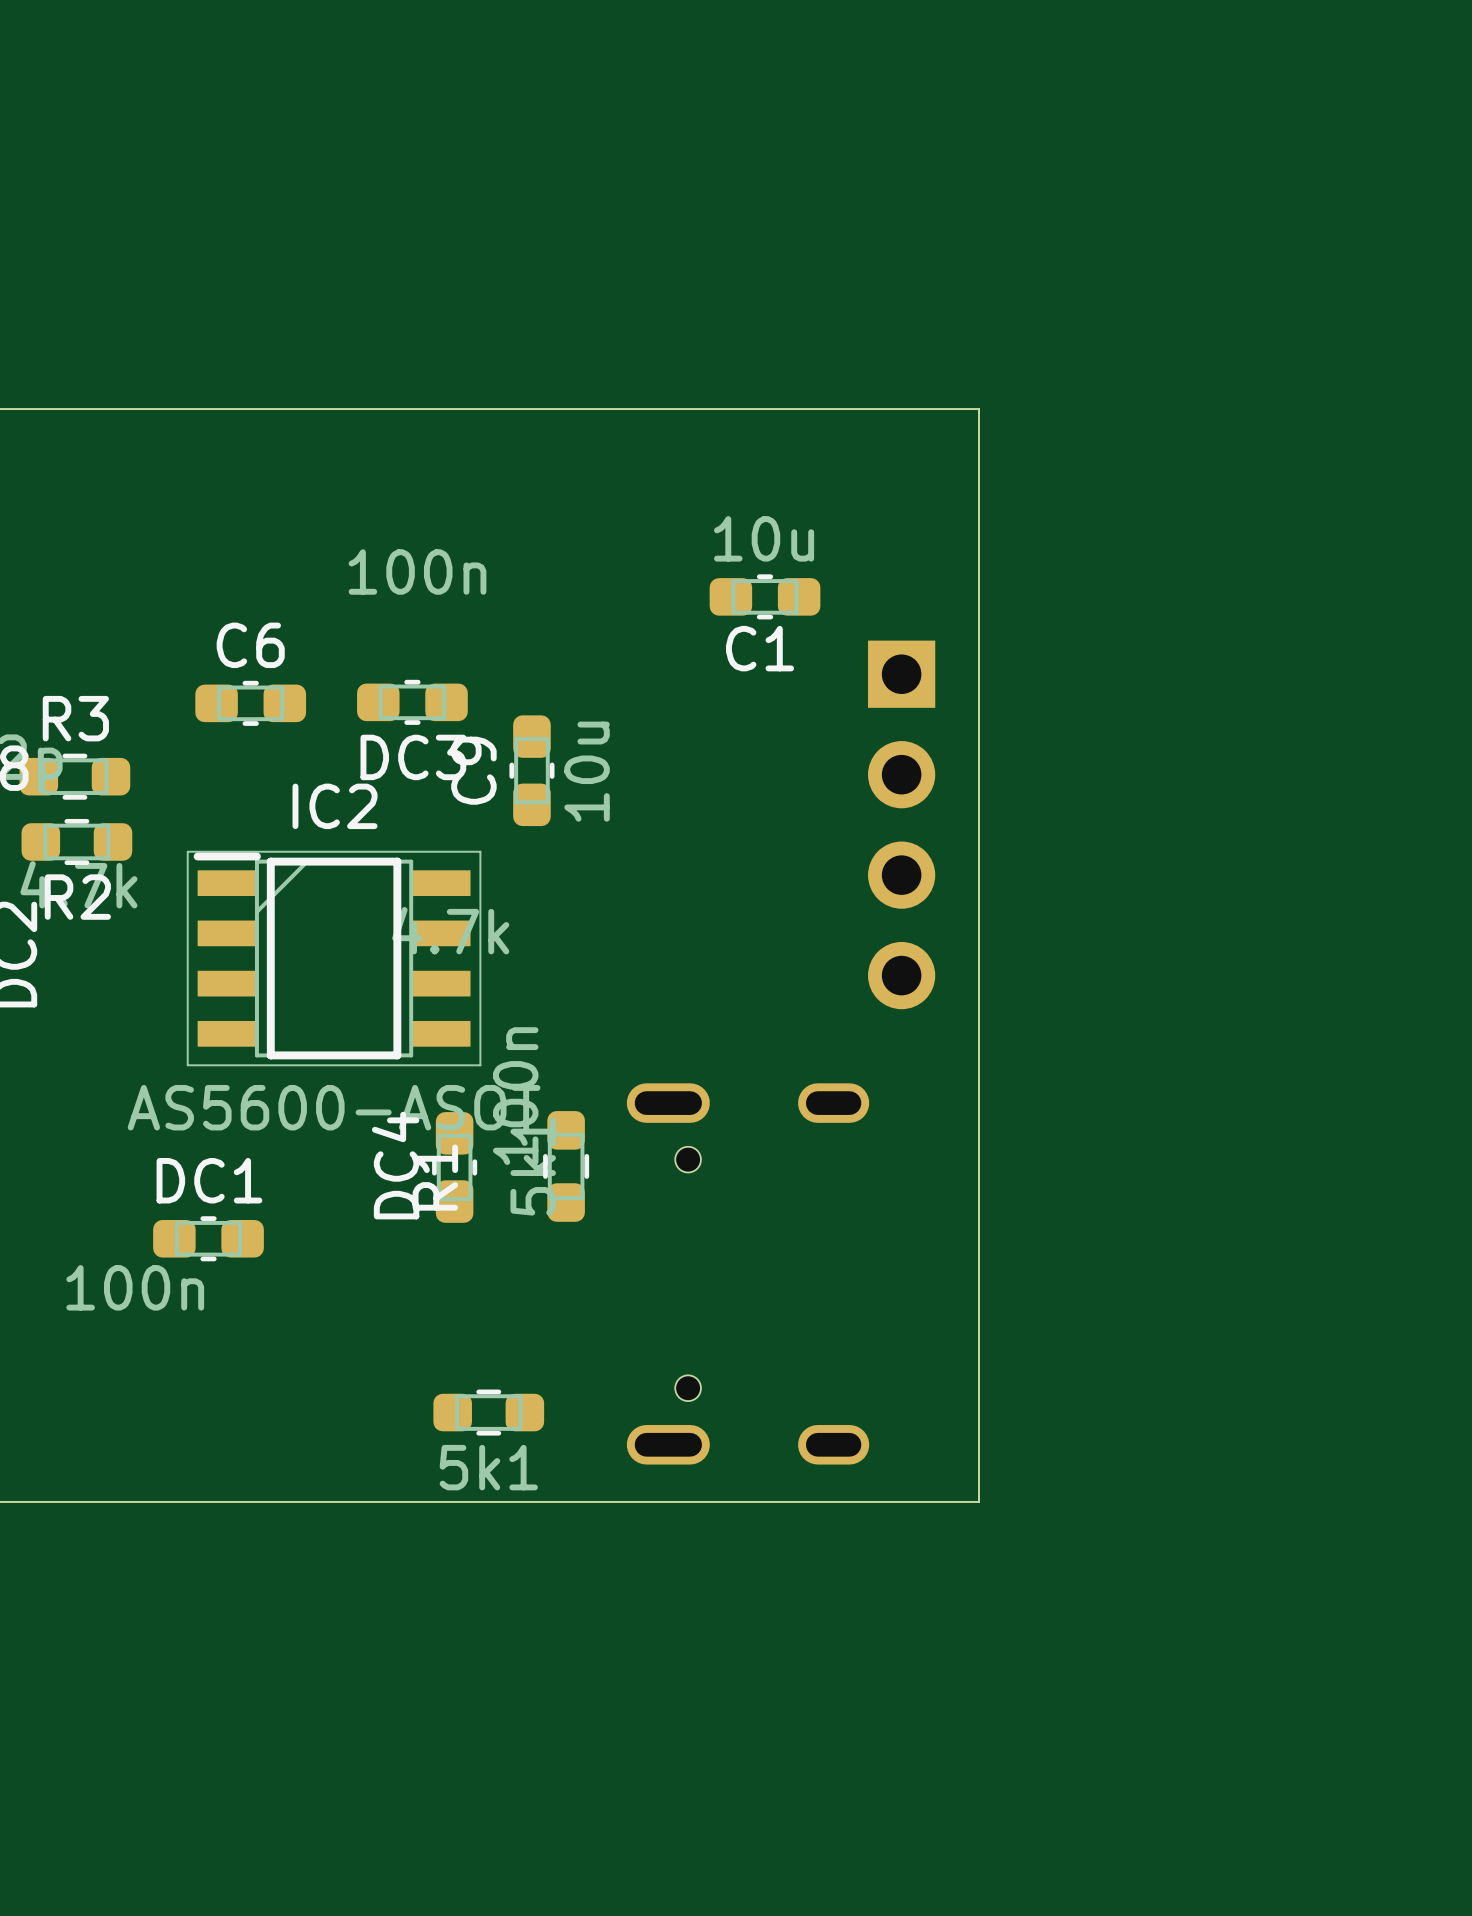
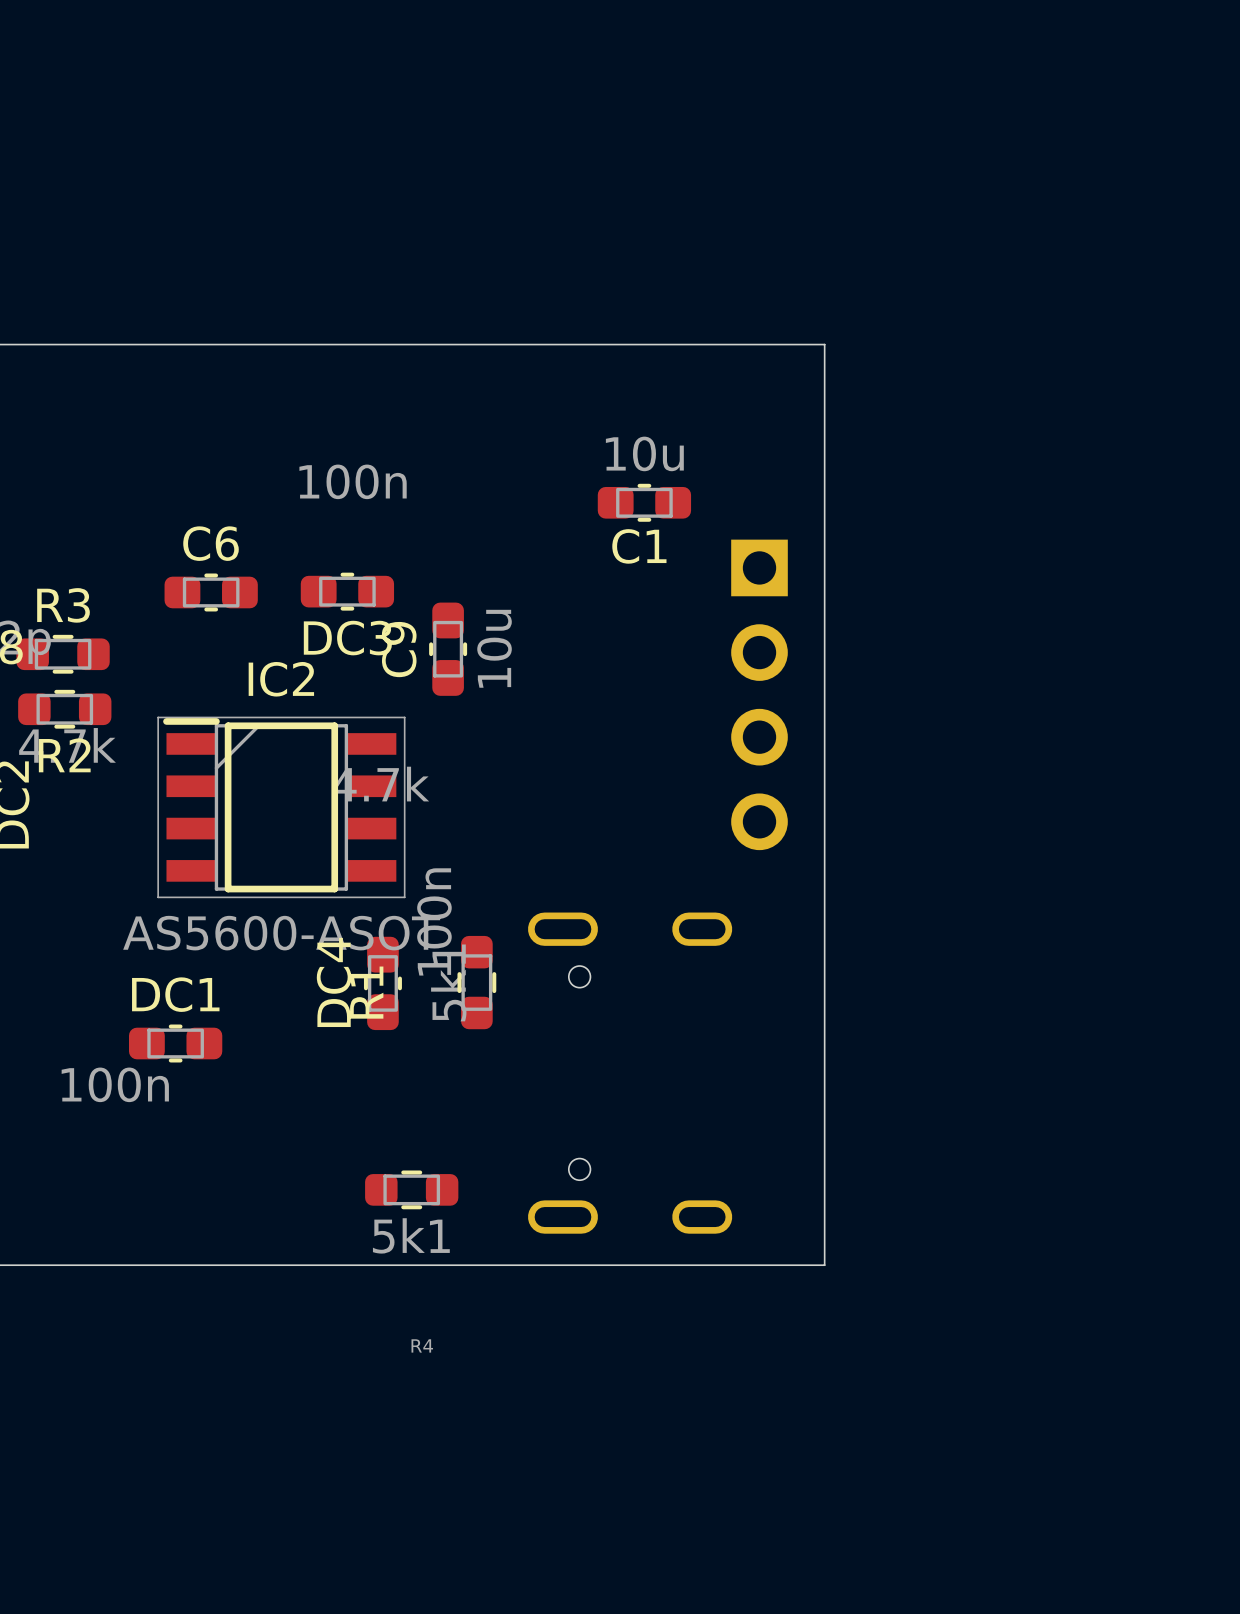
R4 name: none -> R4 (422, 1345)

